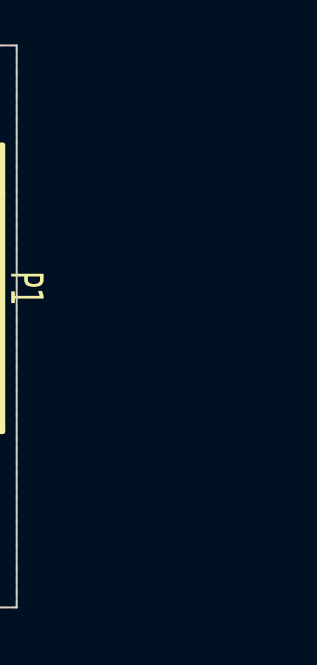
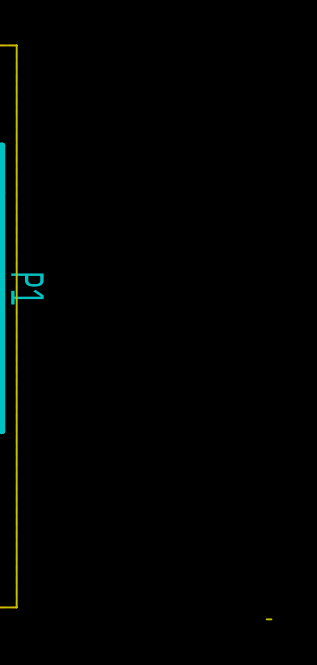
board edge: none -> (271, 619) (266, 619)

